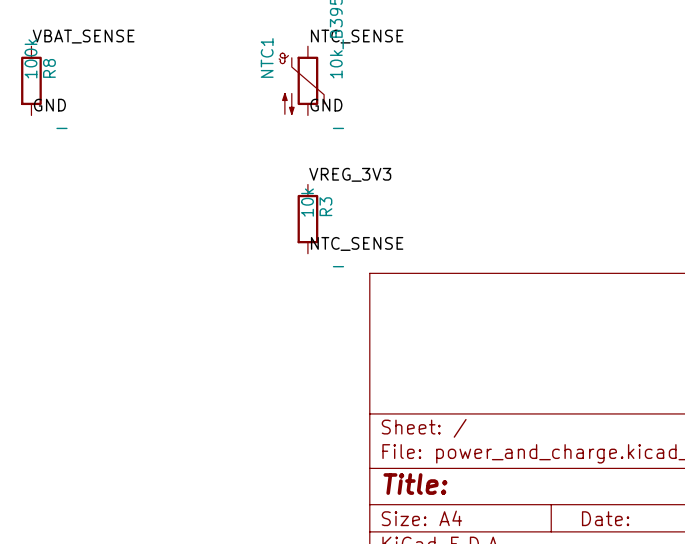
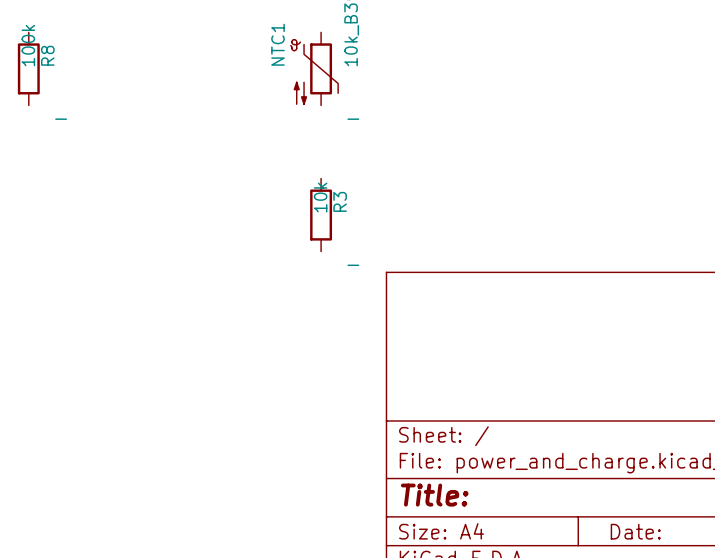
label: VBAT_SENSE (83, 36) -> none
label: NTC_SENSE (357, 36) -> none
label: GND (49, 105) -> none
label: GND (326, 105) -> none
label: VREG_3V3 (350, 174) -> none
label: NTC_SENSE (357, 243) -> none

